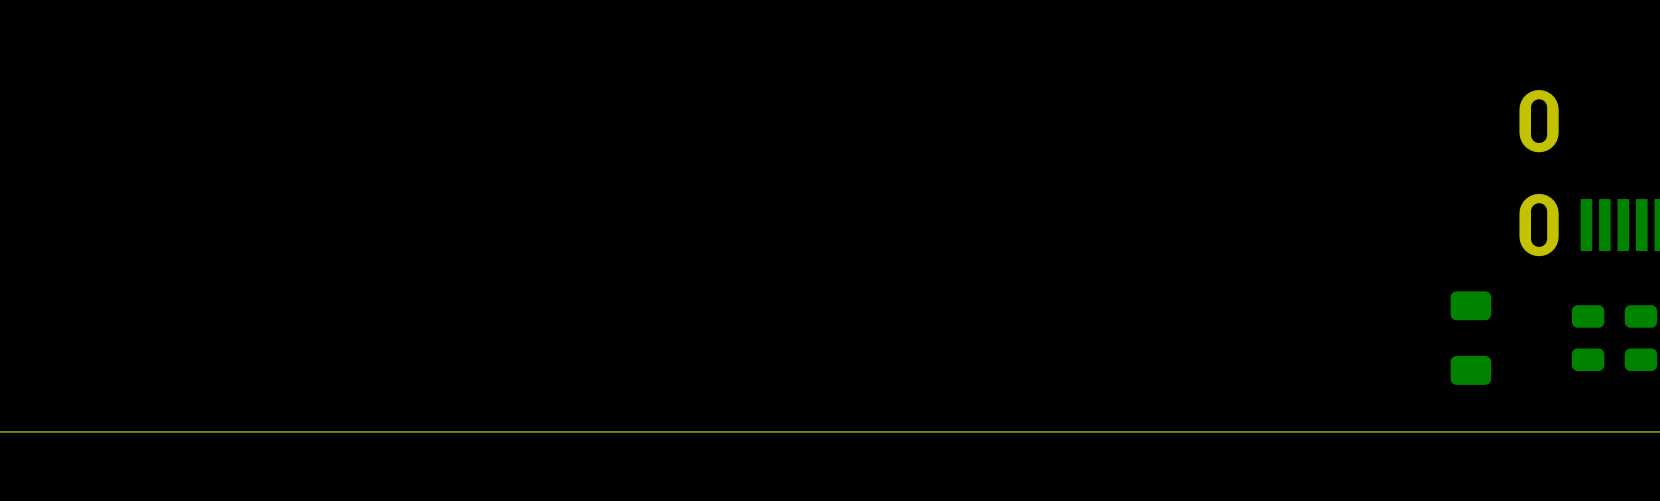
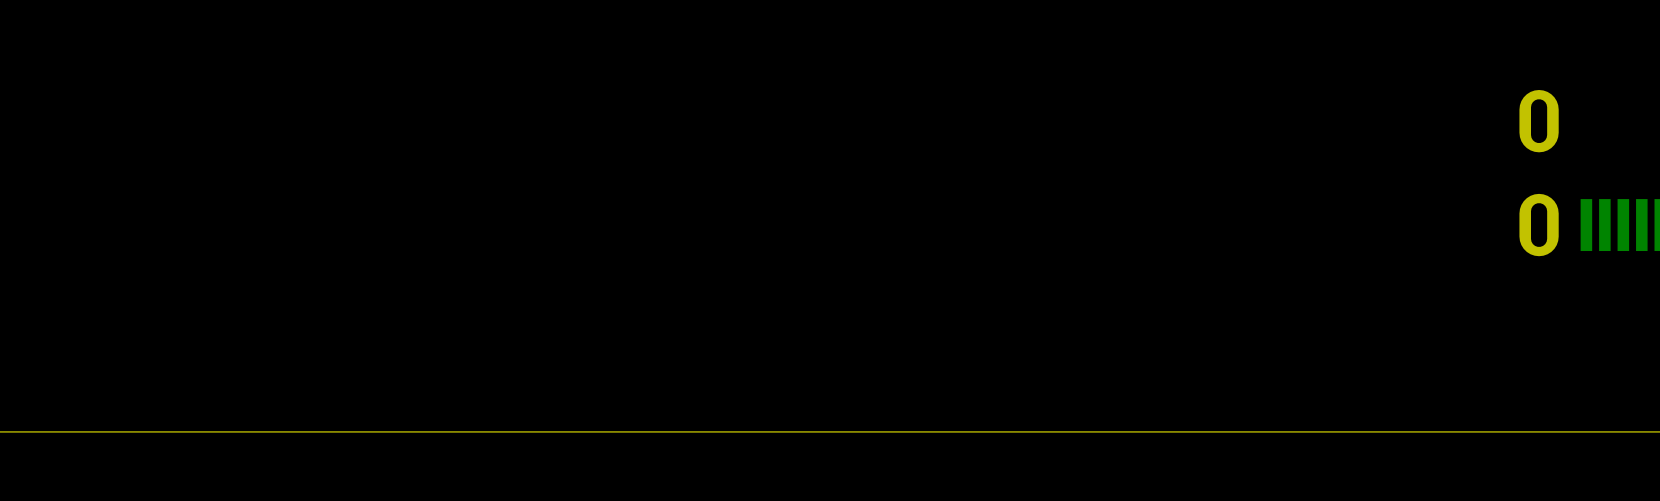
part: (1470, 338) -> none
part: (1588, 338) -> none
part: (1640, 338) -> none

